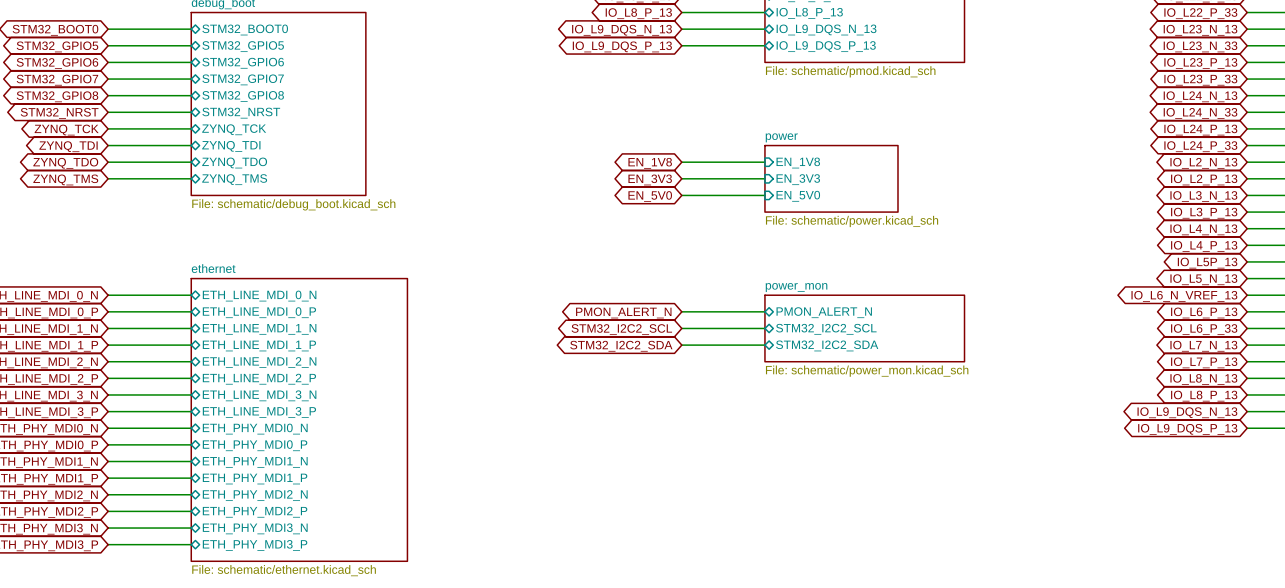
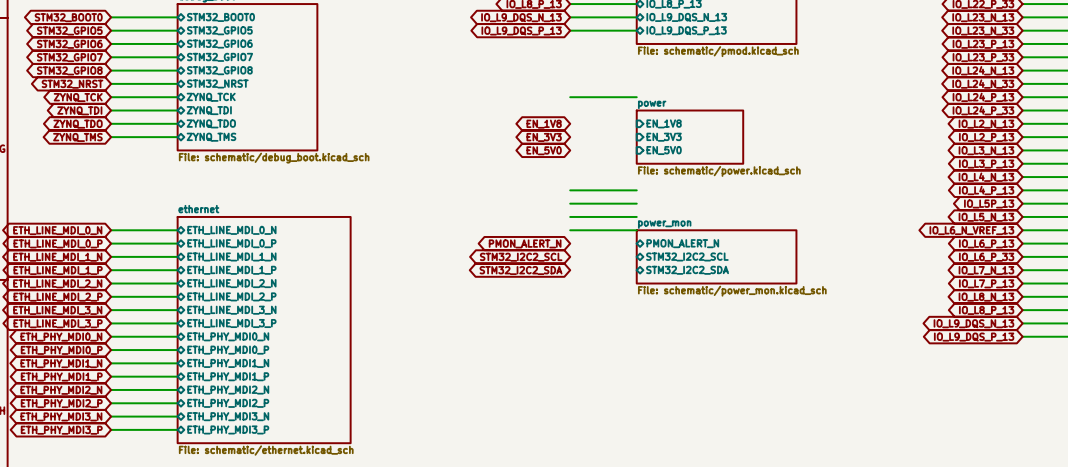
wire: none -> (570, 97) (636, 97)
wire: (681, 162) (764, 162) -> (570, 203) (636, 203)
wire: (681, 178) (764, 178) -> (570, 216) (636, 216)
wire: (681, 195) (764, 195) -> (570, 230) (636, 230)
wire: (681, 311) (764, 311) -> (570, 190) (636, 190)
wire: (681, 328) (764, 328) -> none
wire: (681, 345) (764, 345) -> none

